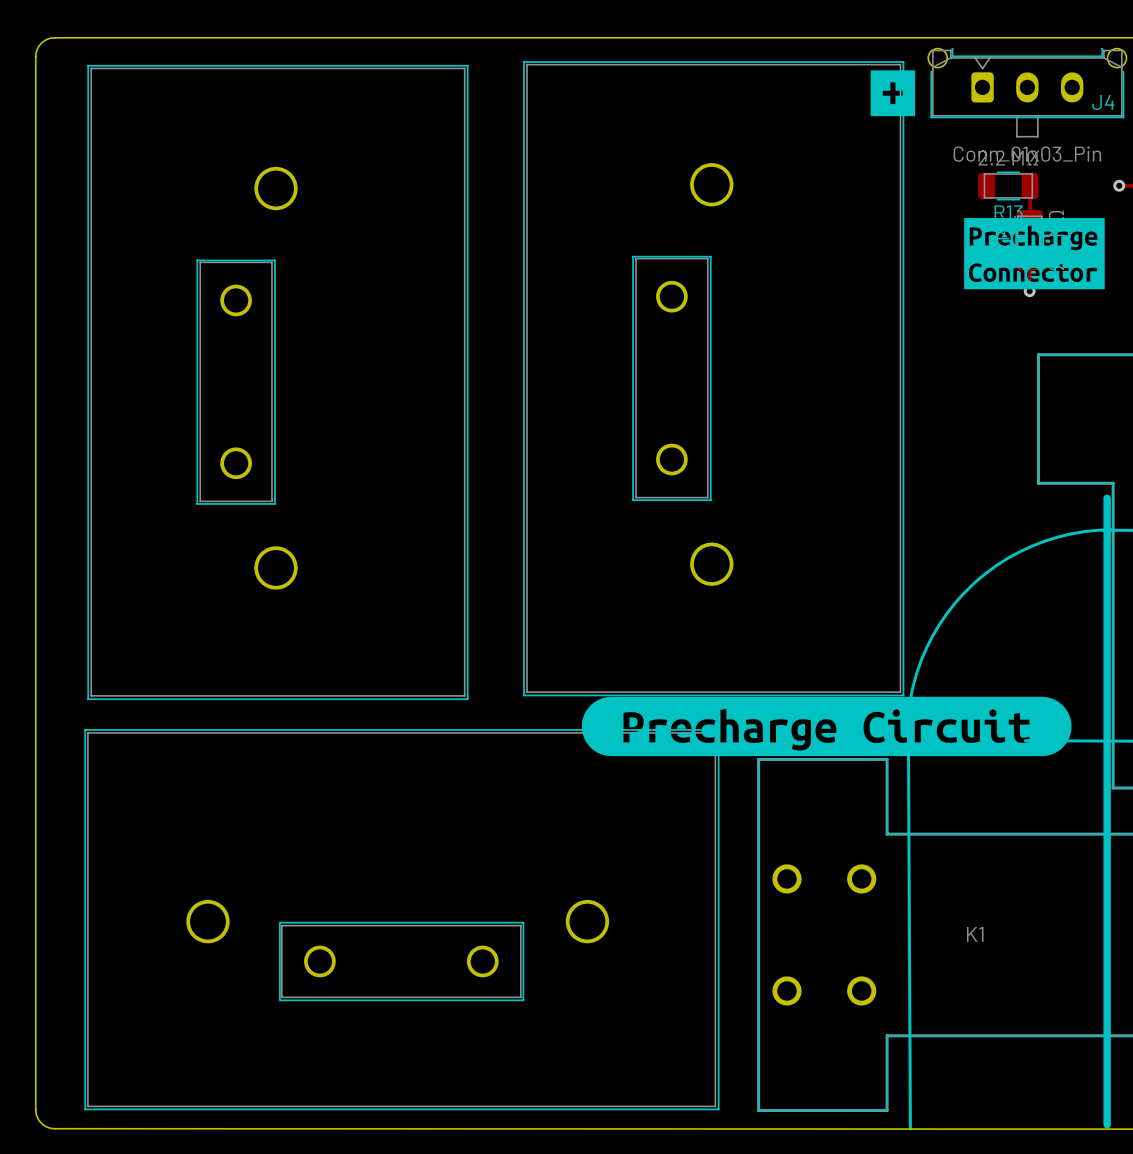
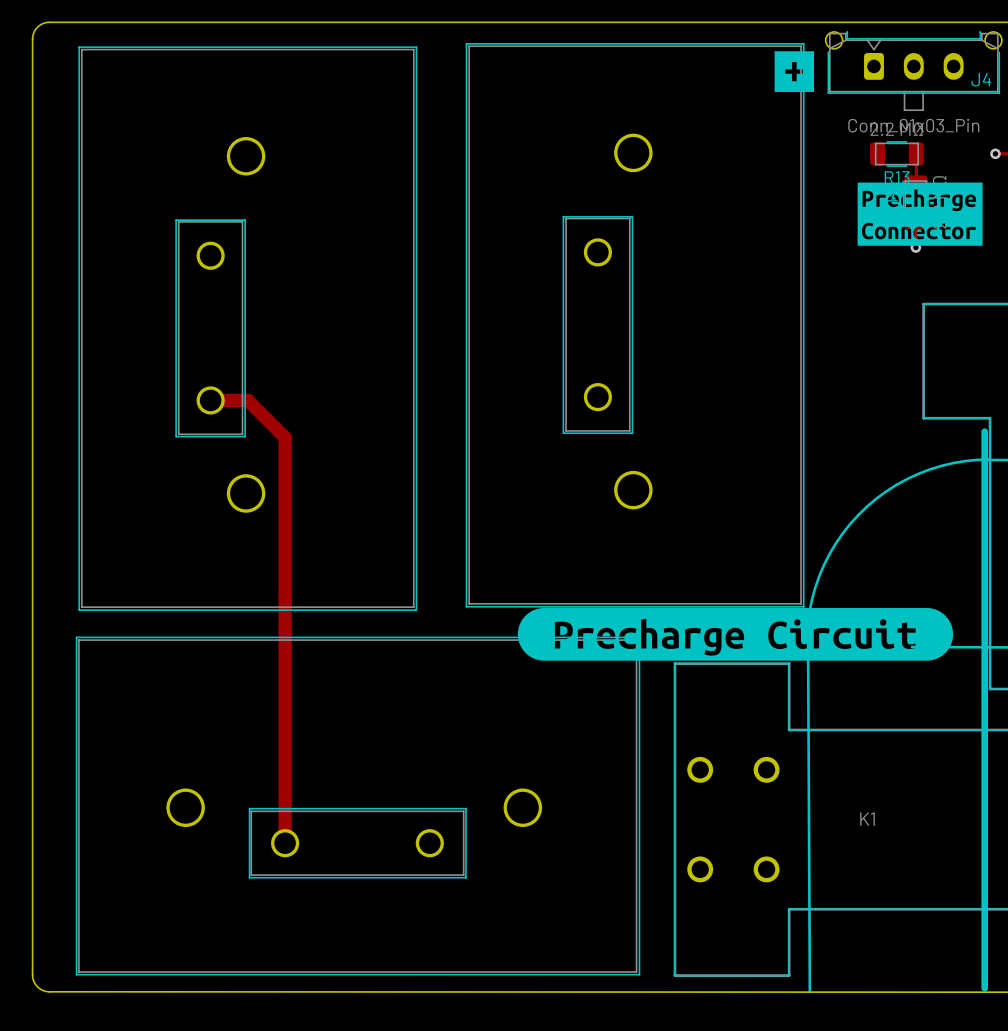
track: none -> (210, 400) (247, 400) (285, 437) (285, 843)

